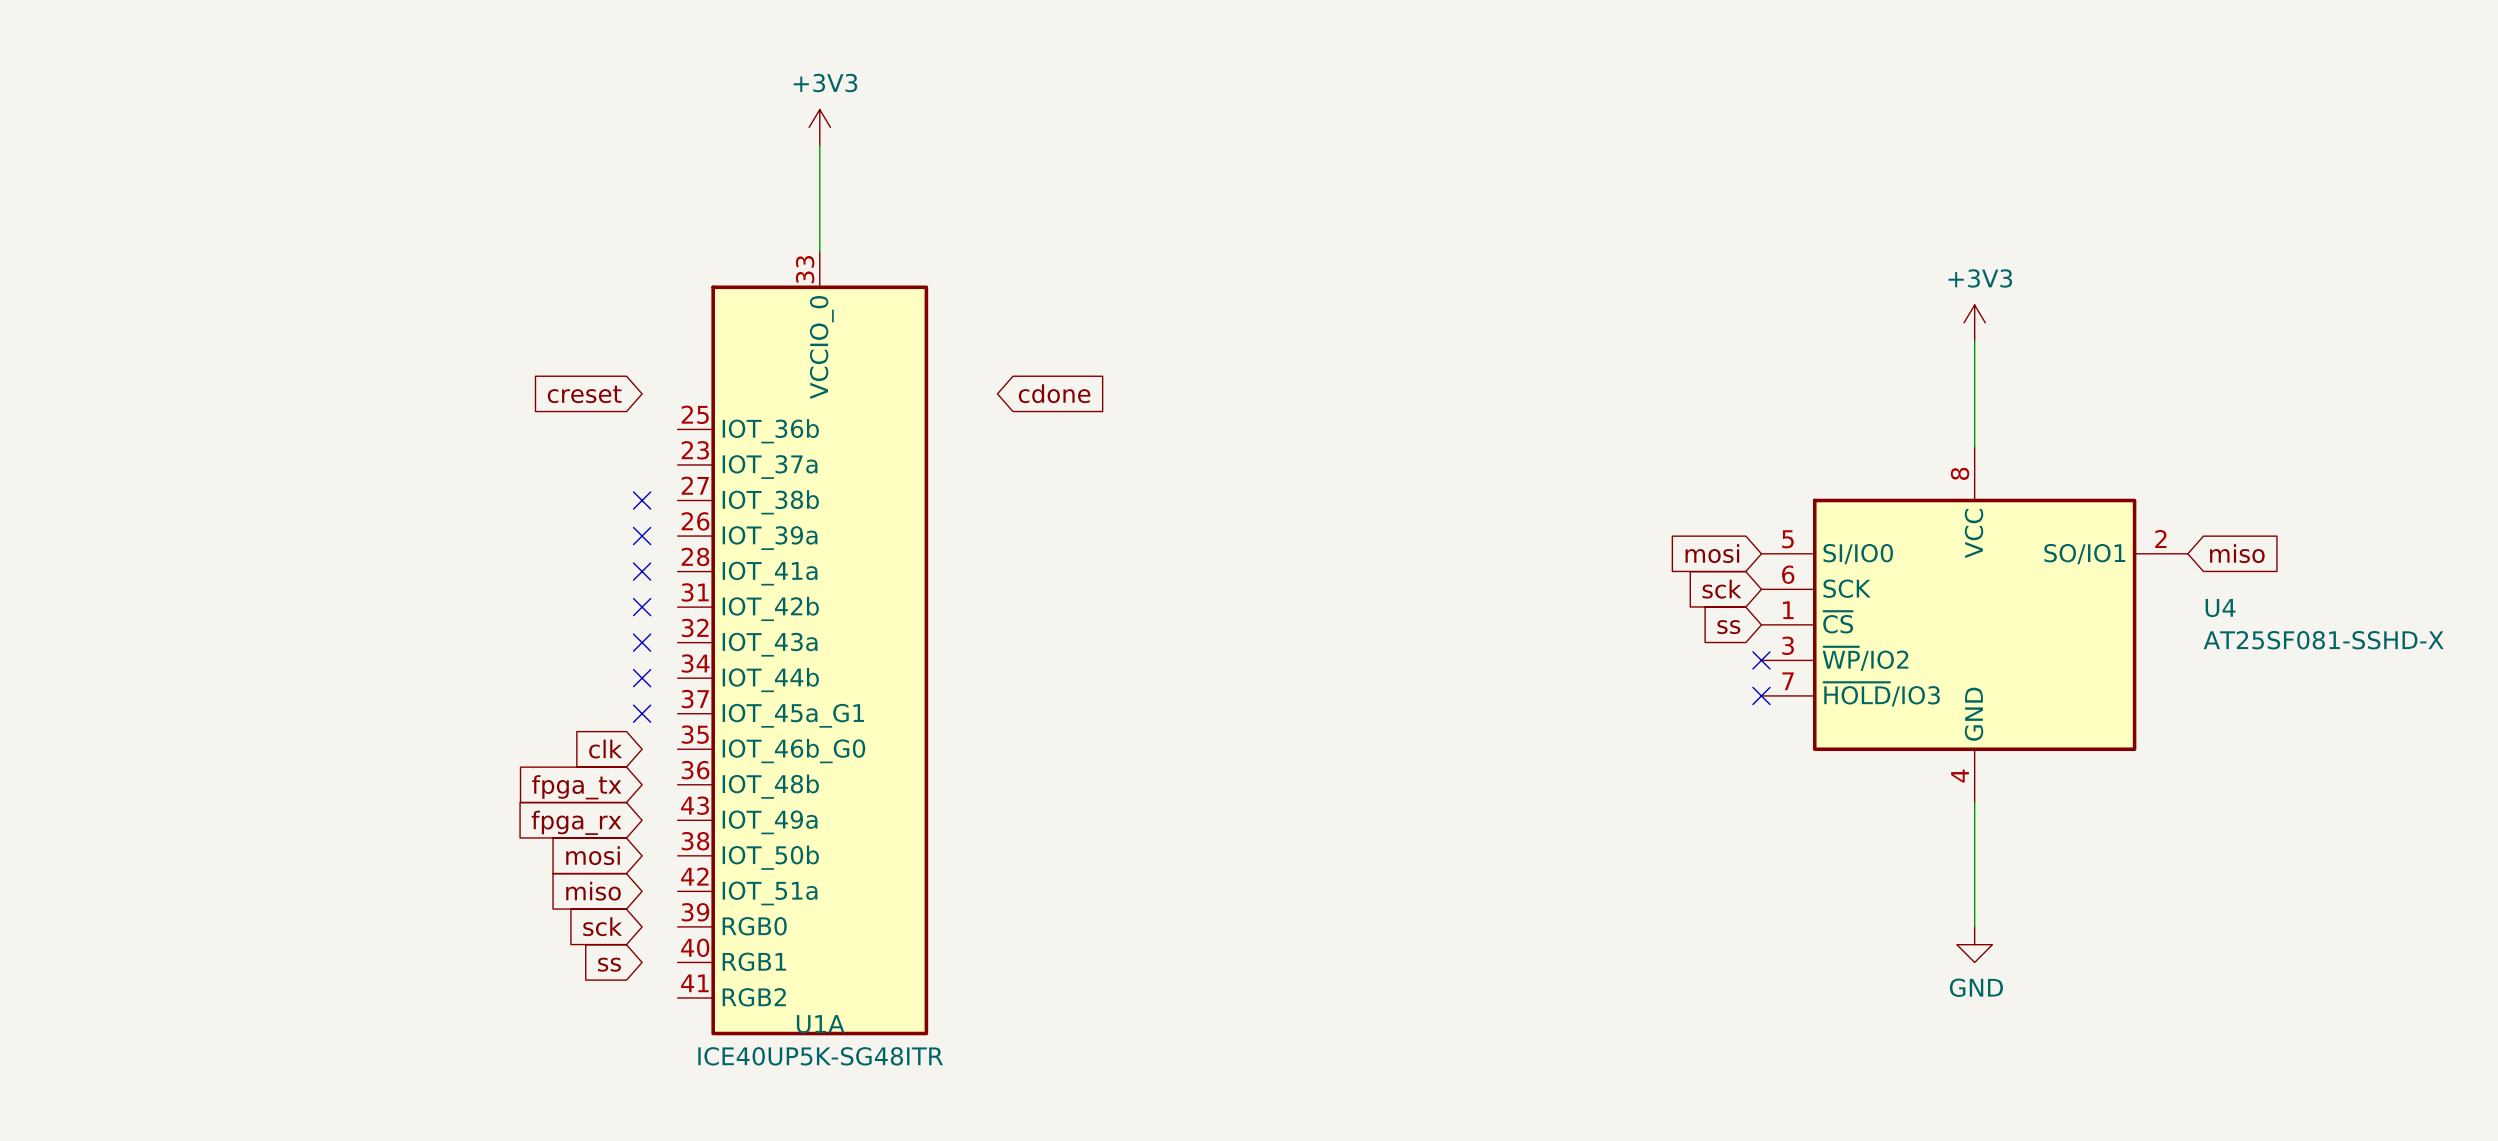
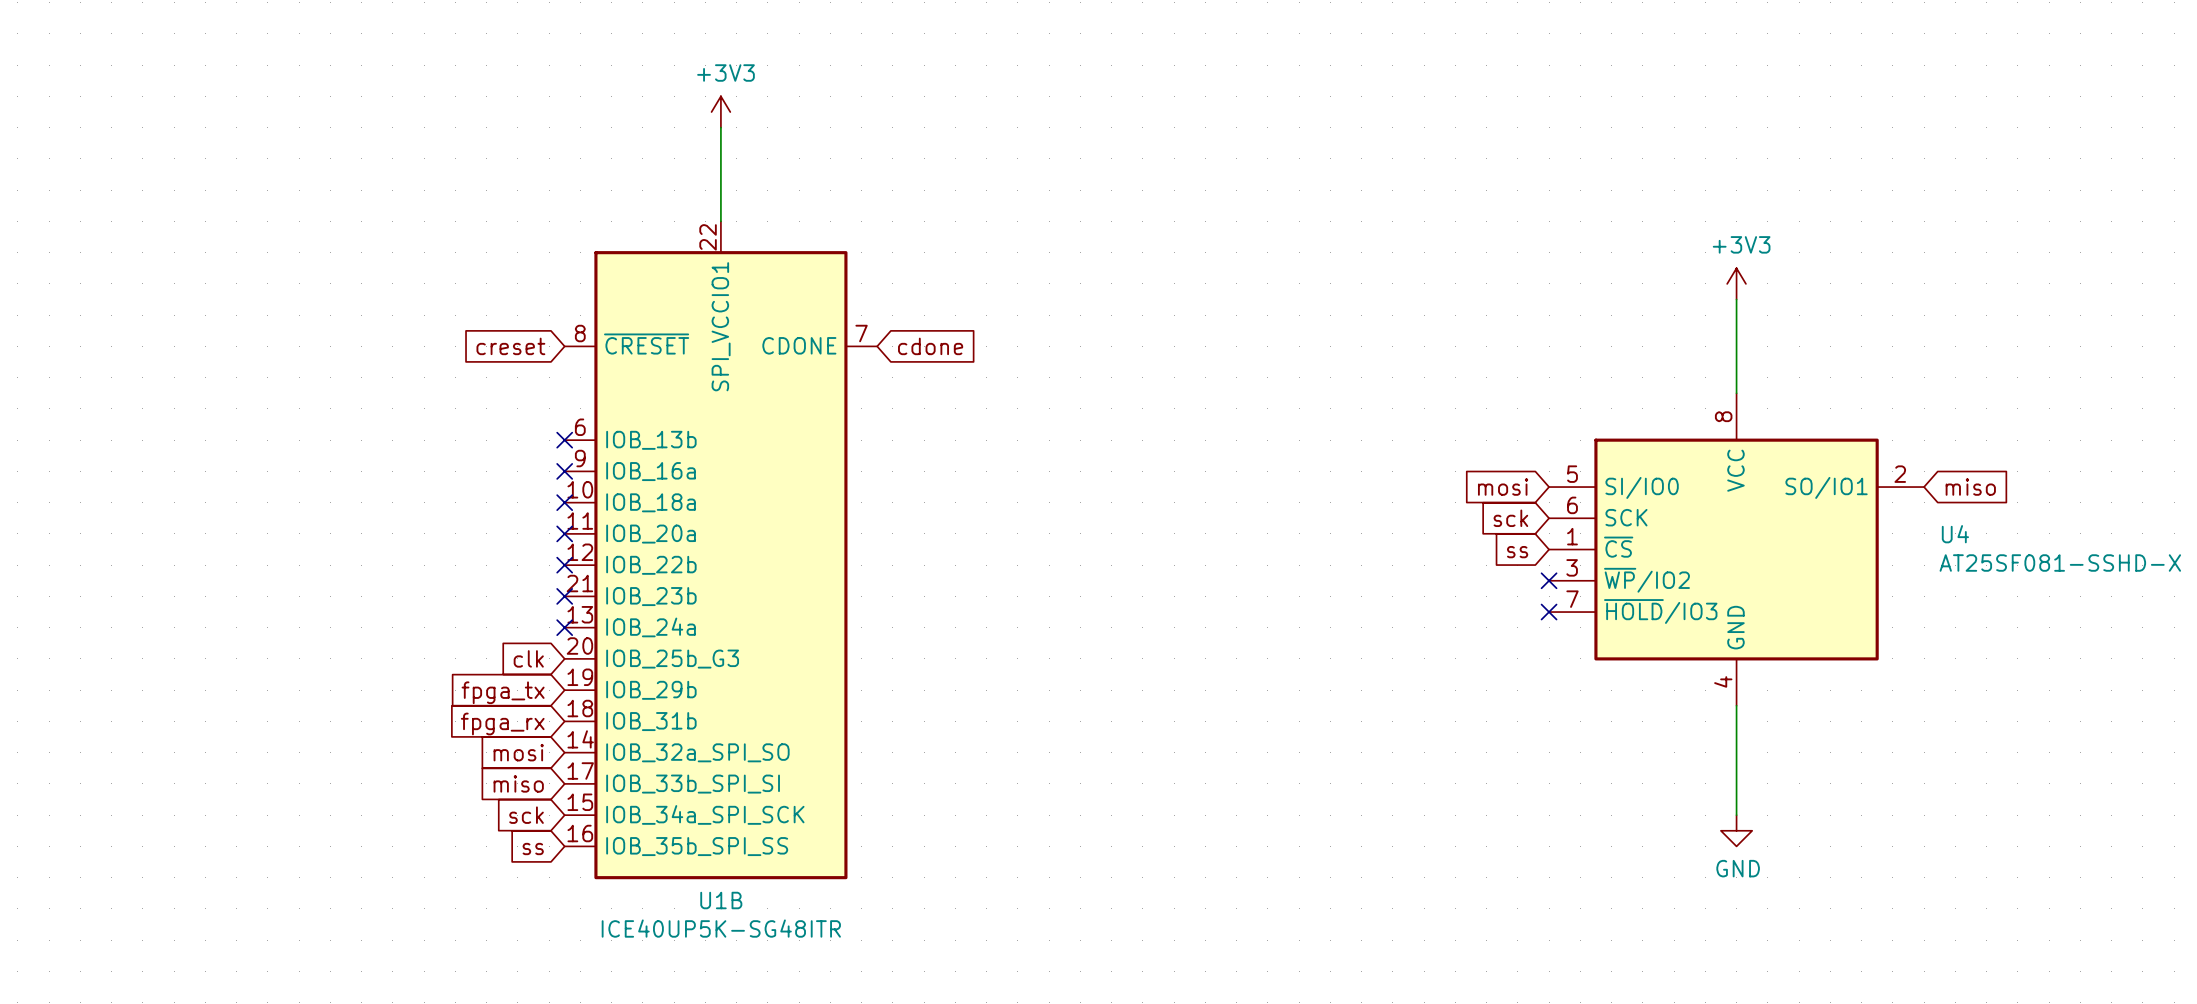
U1B: none -> ICE40UP5K-SG48ITR (720, 550)
U1A: ICE40UP5K-SG48ITR (802, 643) -> none

